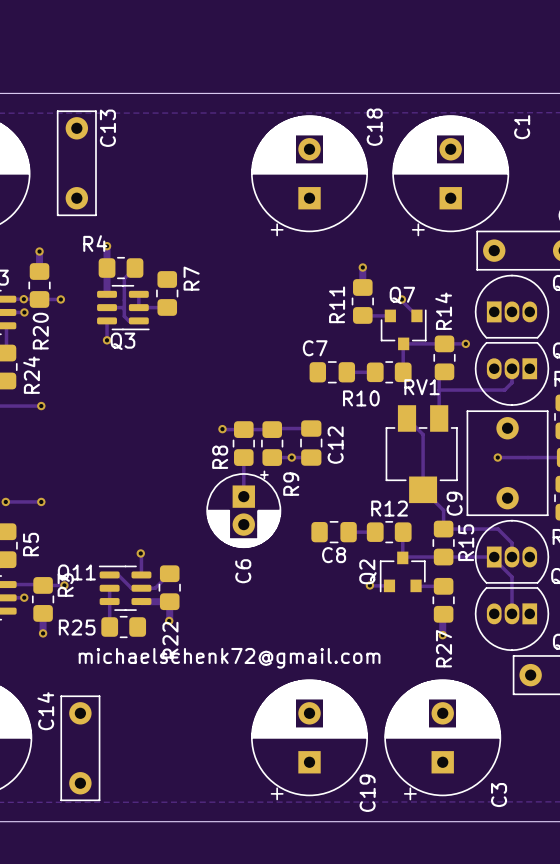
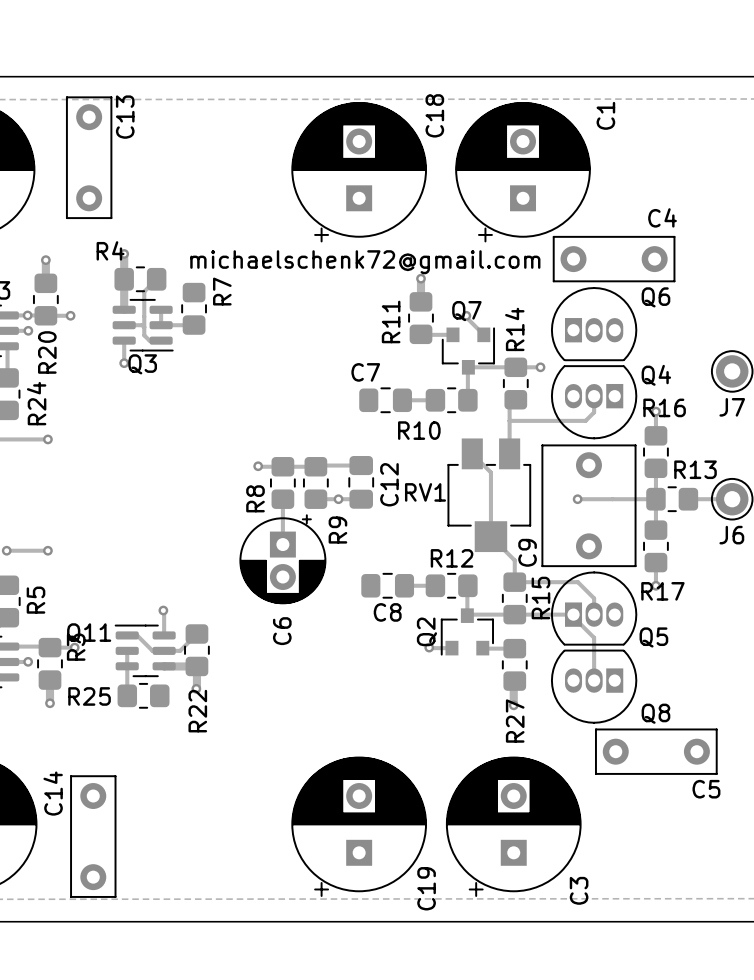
text: none -> michaelschenk72@gmail.com (365, 262)
RV1 name position: RV1 (422, 387) -> RV1 (425, 492)
text: michaelschenk72@gmail.com (229, 658) -> none

